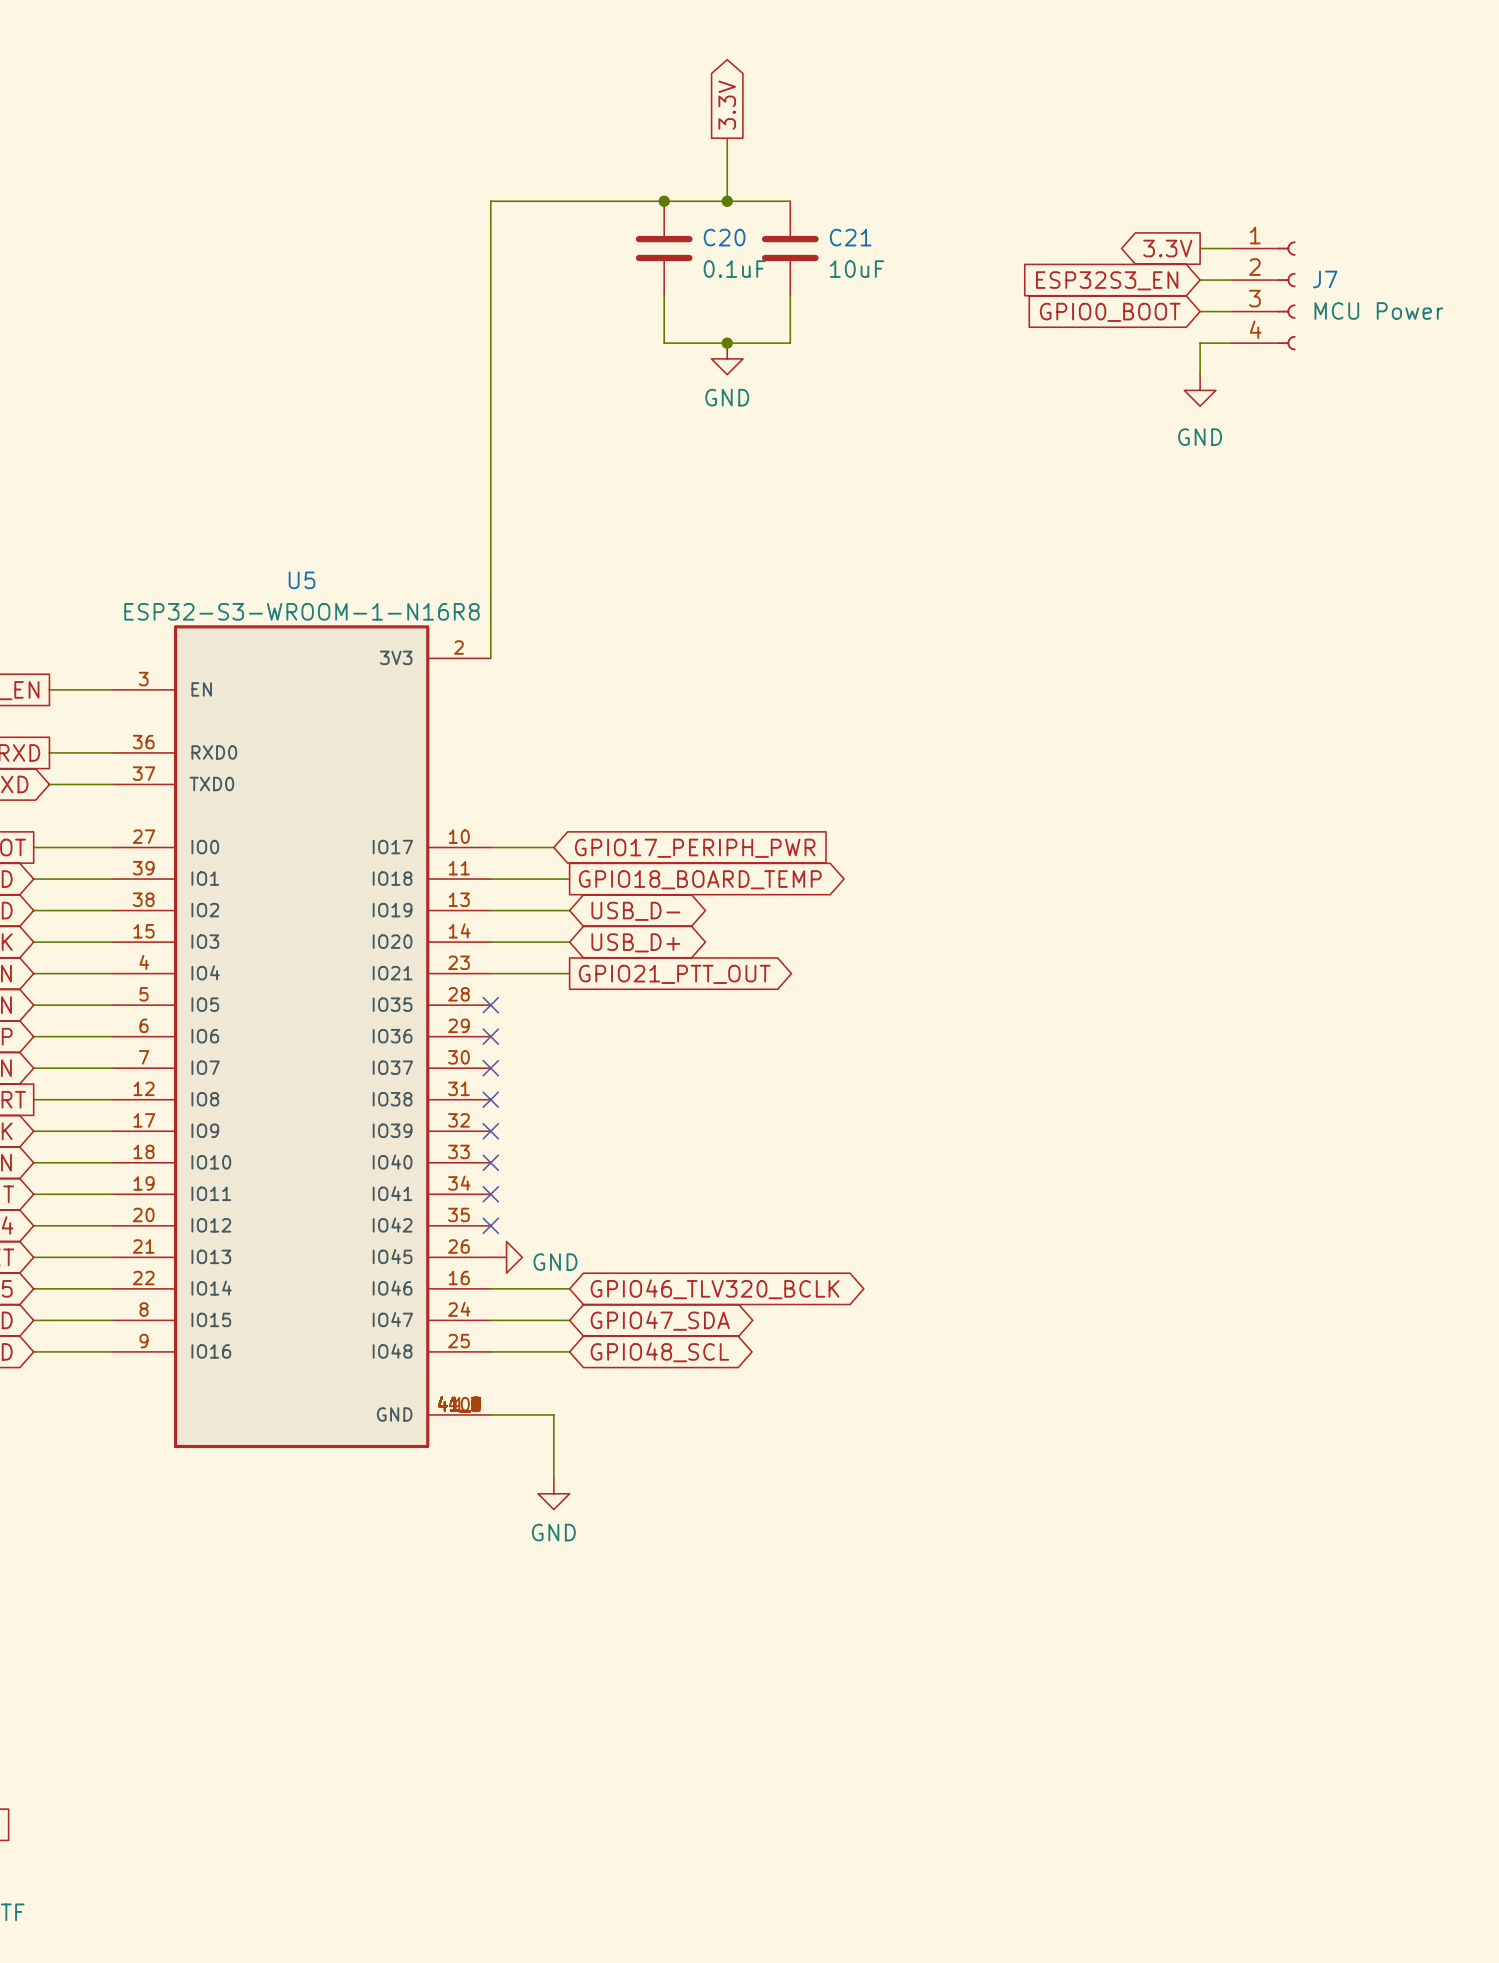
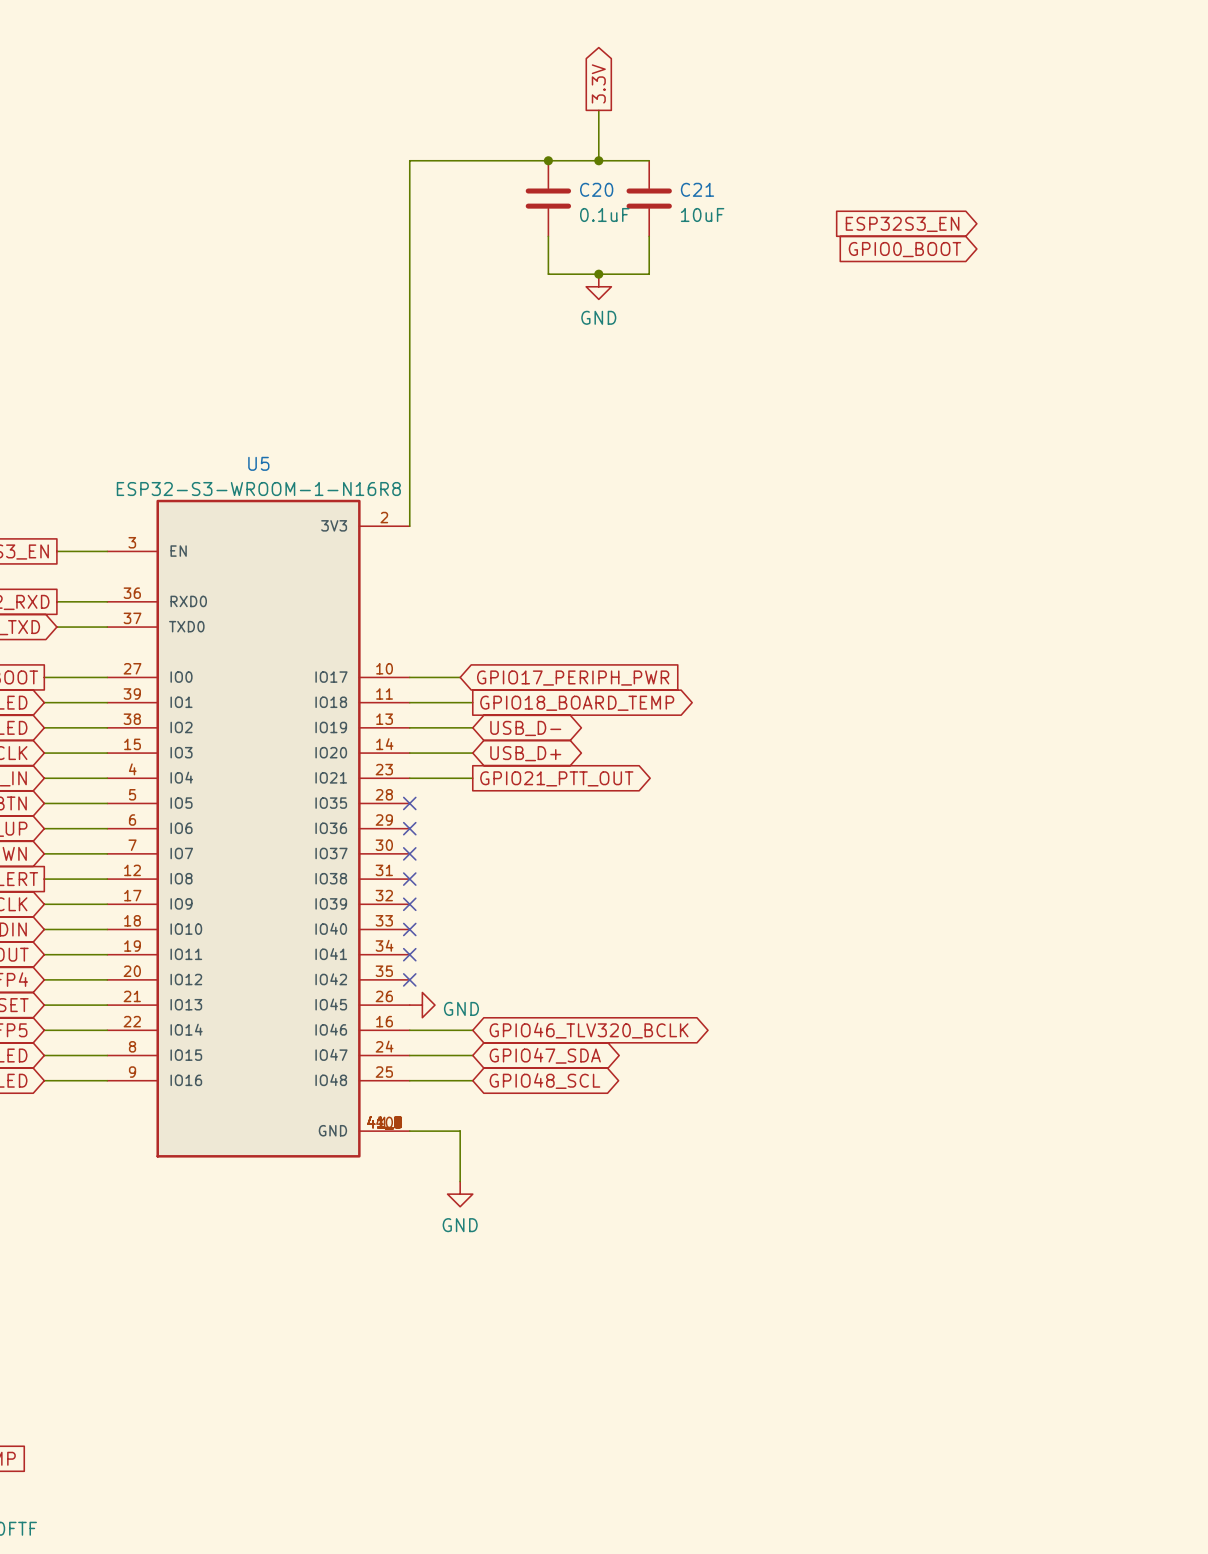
global label: 3.3V (1167, 248) -> none
wire: (1200, 248) (1231, 248) -> none
wire: (1200, 280) (1231, 280) -> none
J7: MCU Power (1263, 295) -> none
wire: (1200, 311) (1231, 311) -> none
wire: (1231, 343) (1200, 343) (1200, 374) -> none
power symbol: GND (1200, 390) -> none

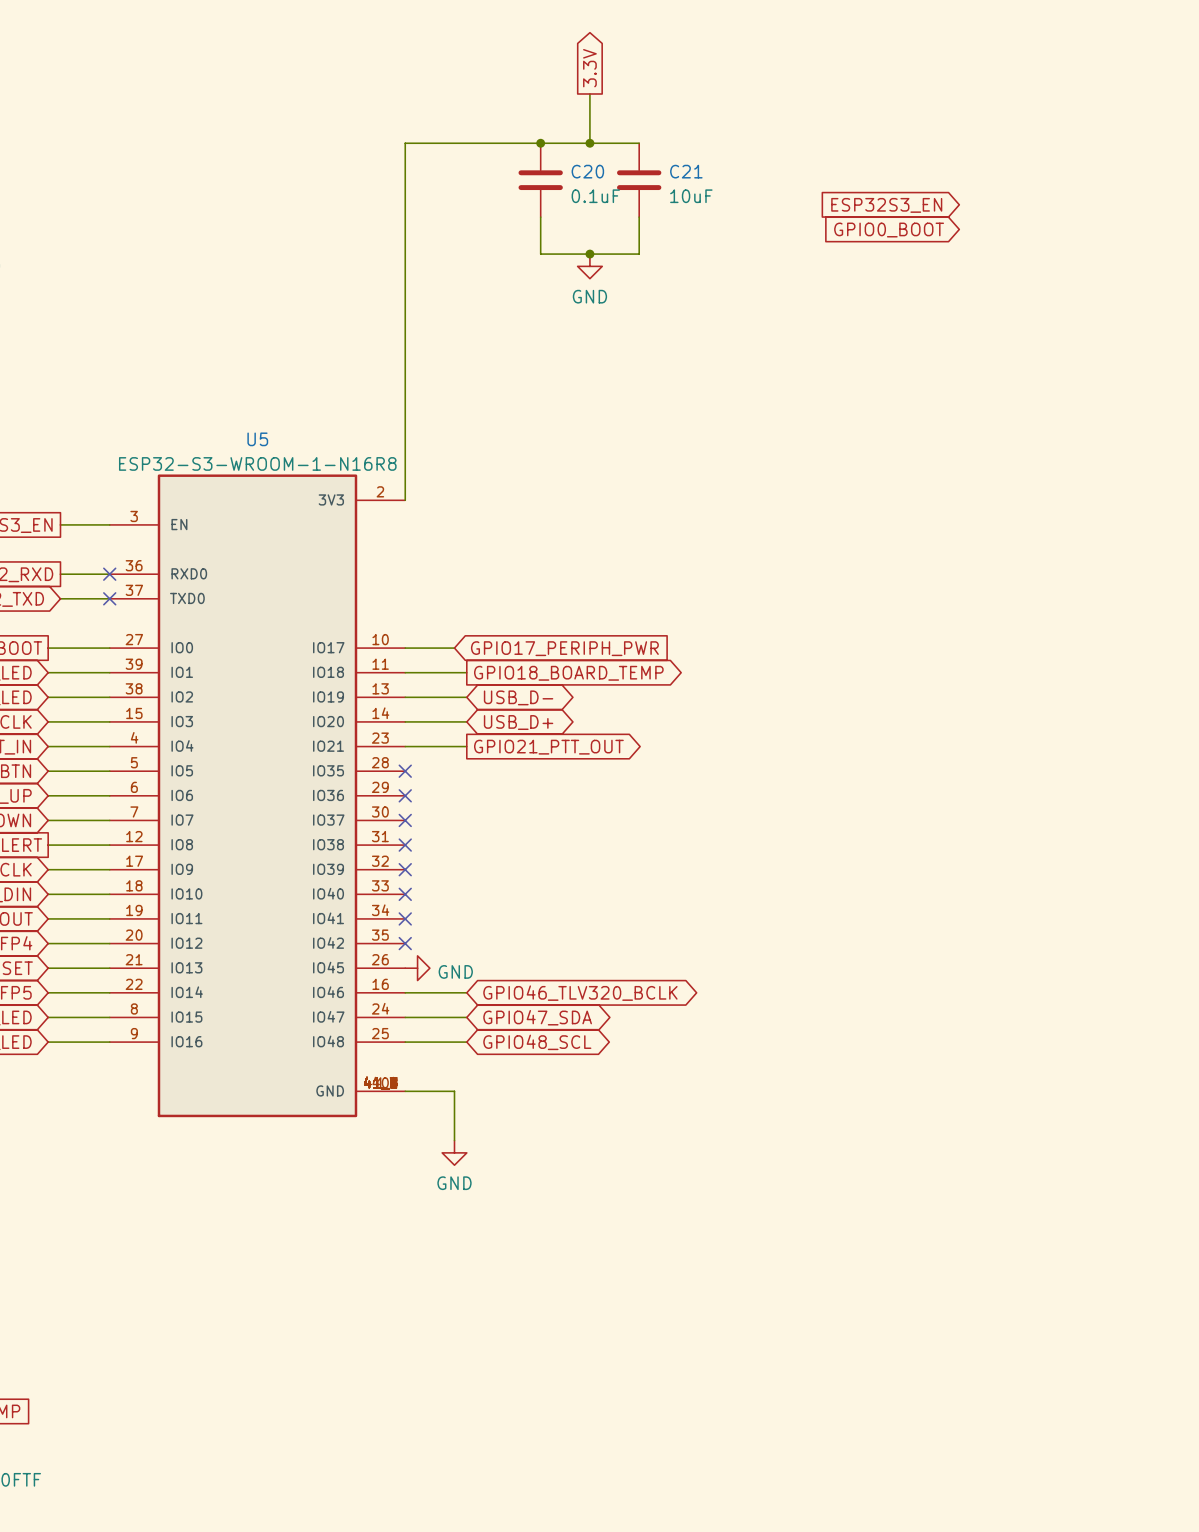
no-connect mark: none -> (109, 574)
no-connect mark: none -> (109, 598)

